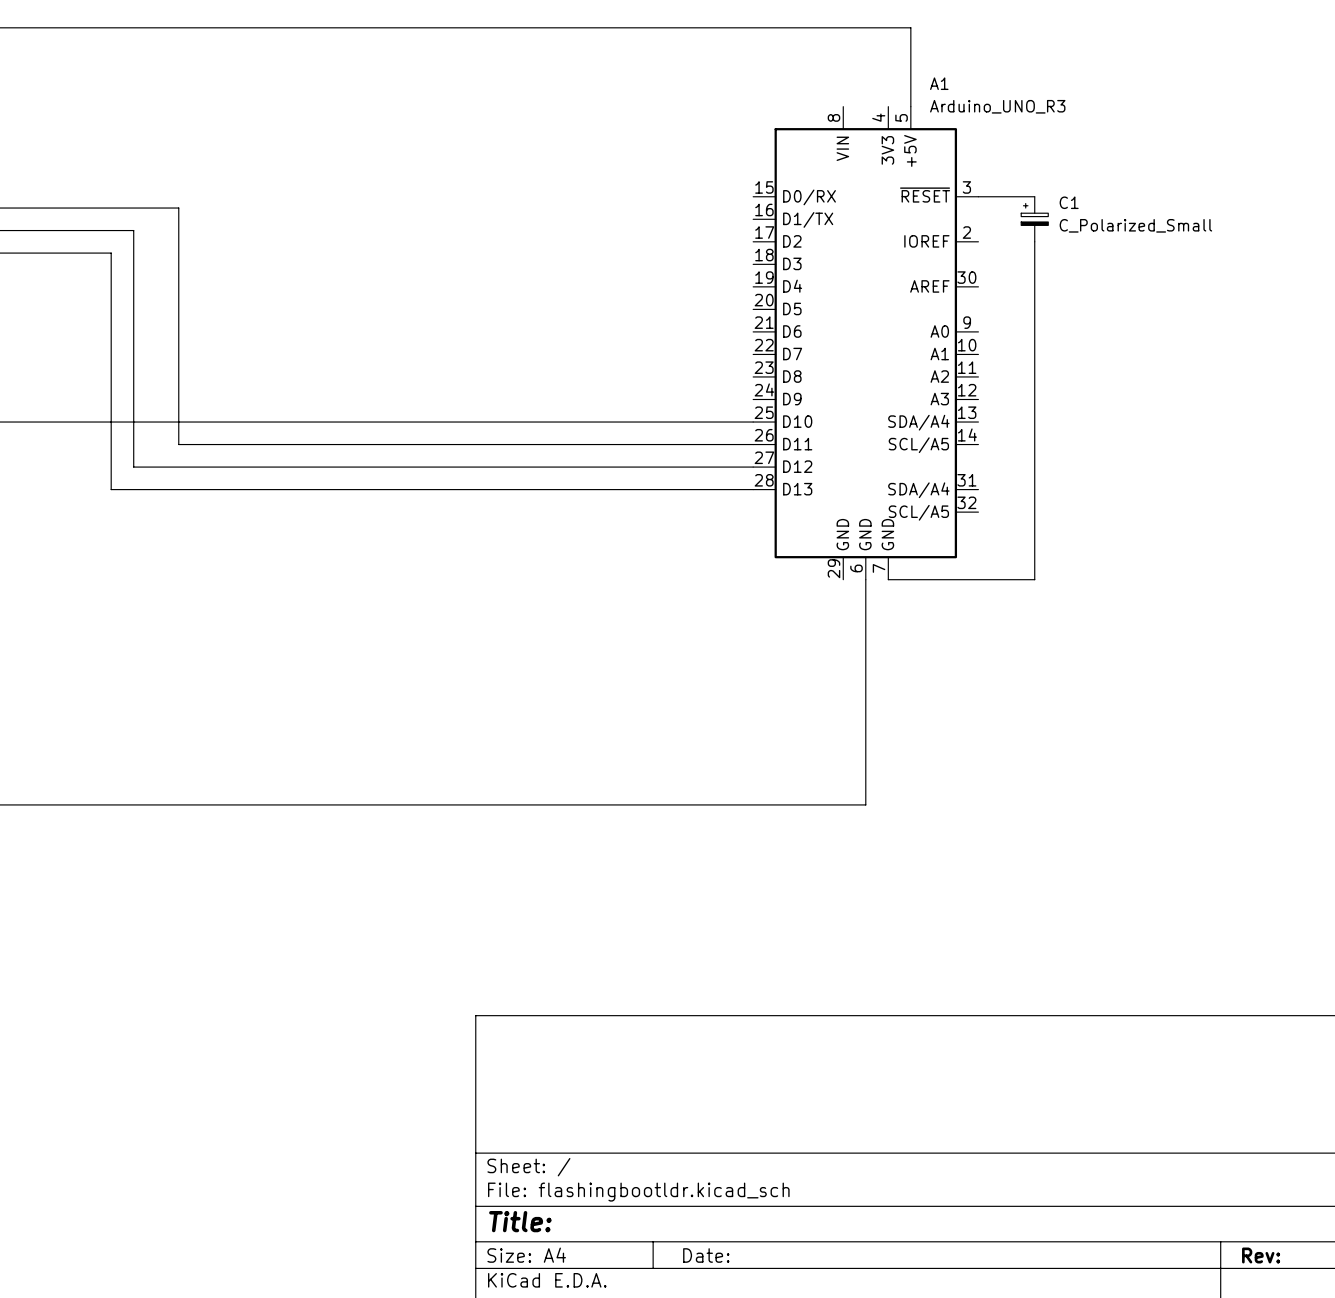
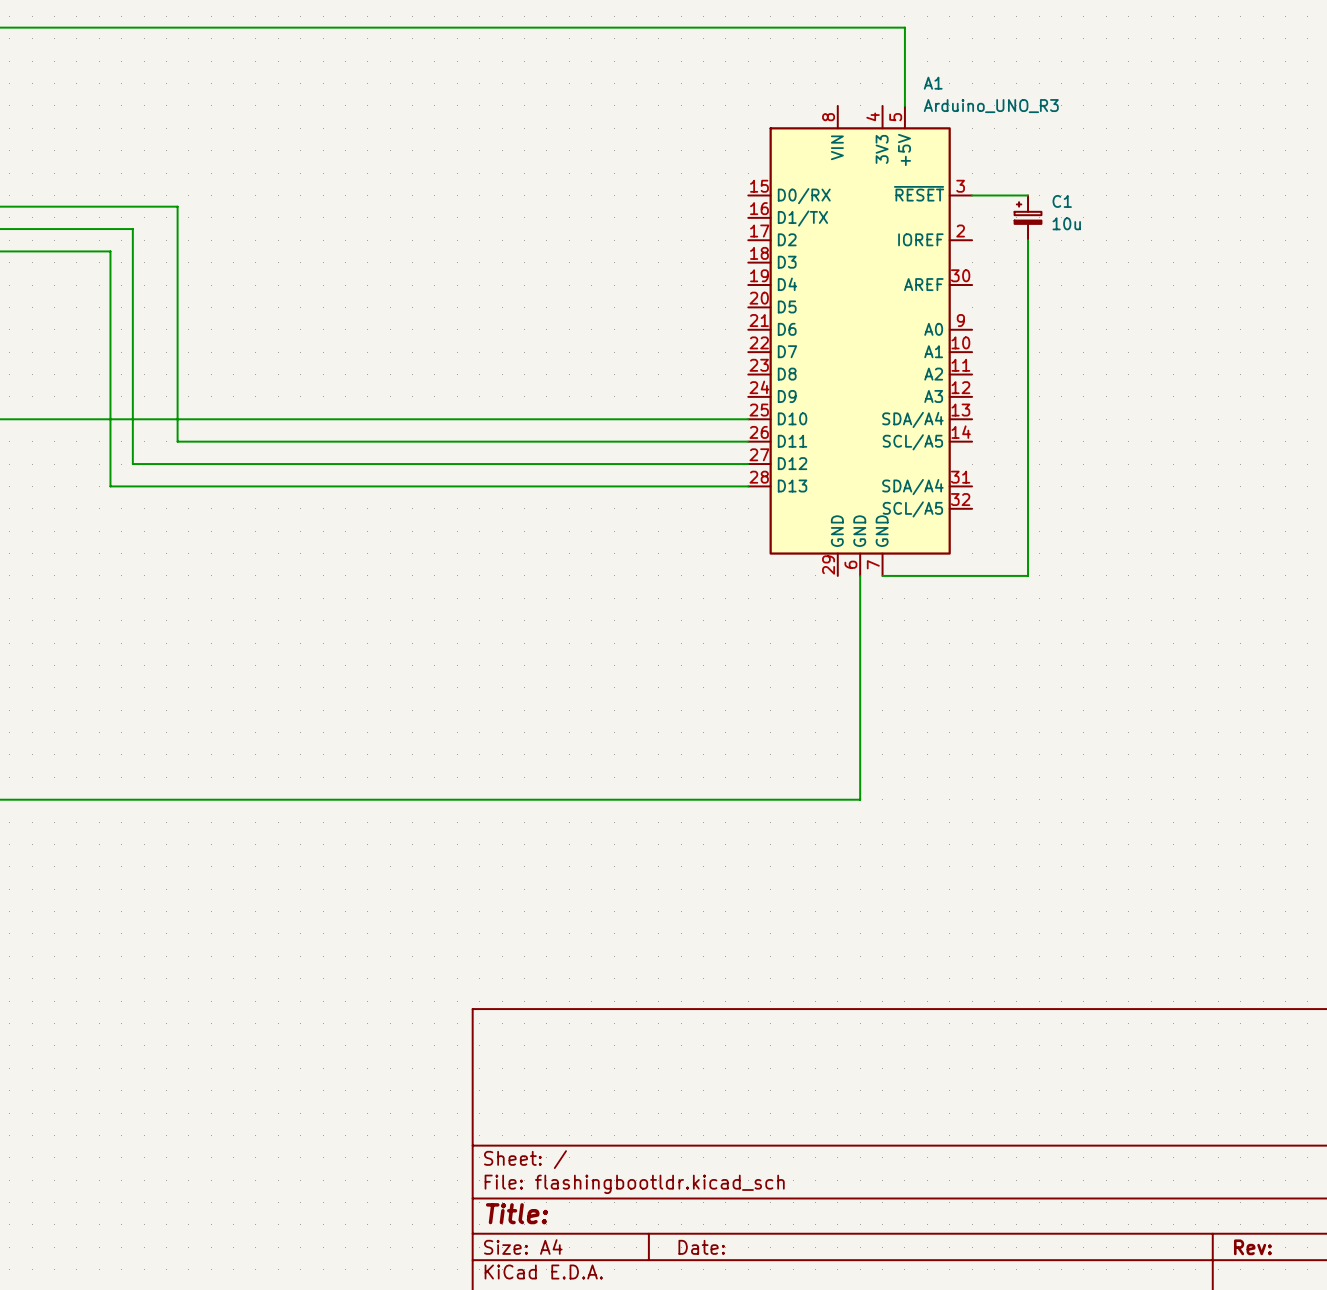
C1 value: C_Polarized_Small (1135, 225) -> 10u (1066, 223)

